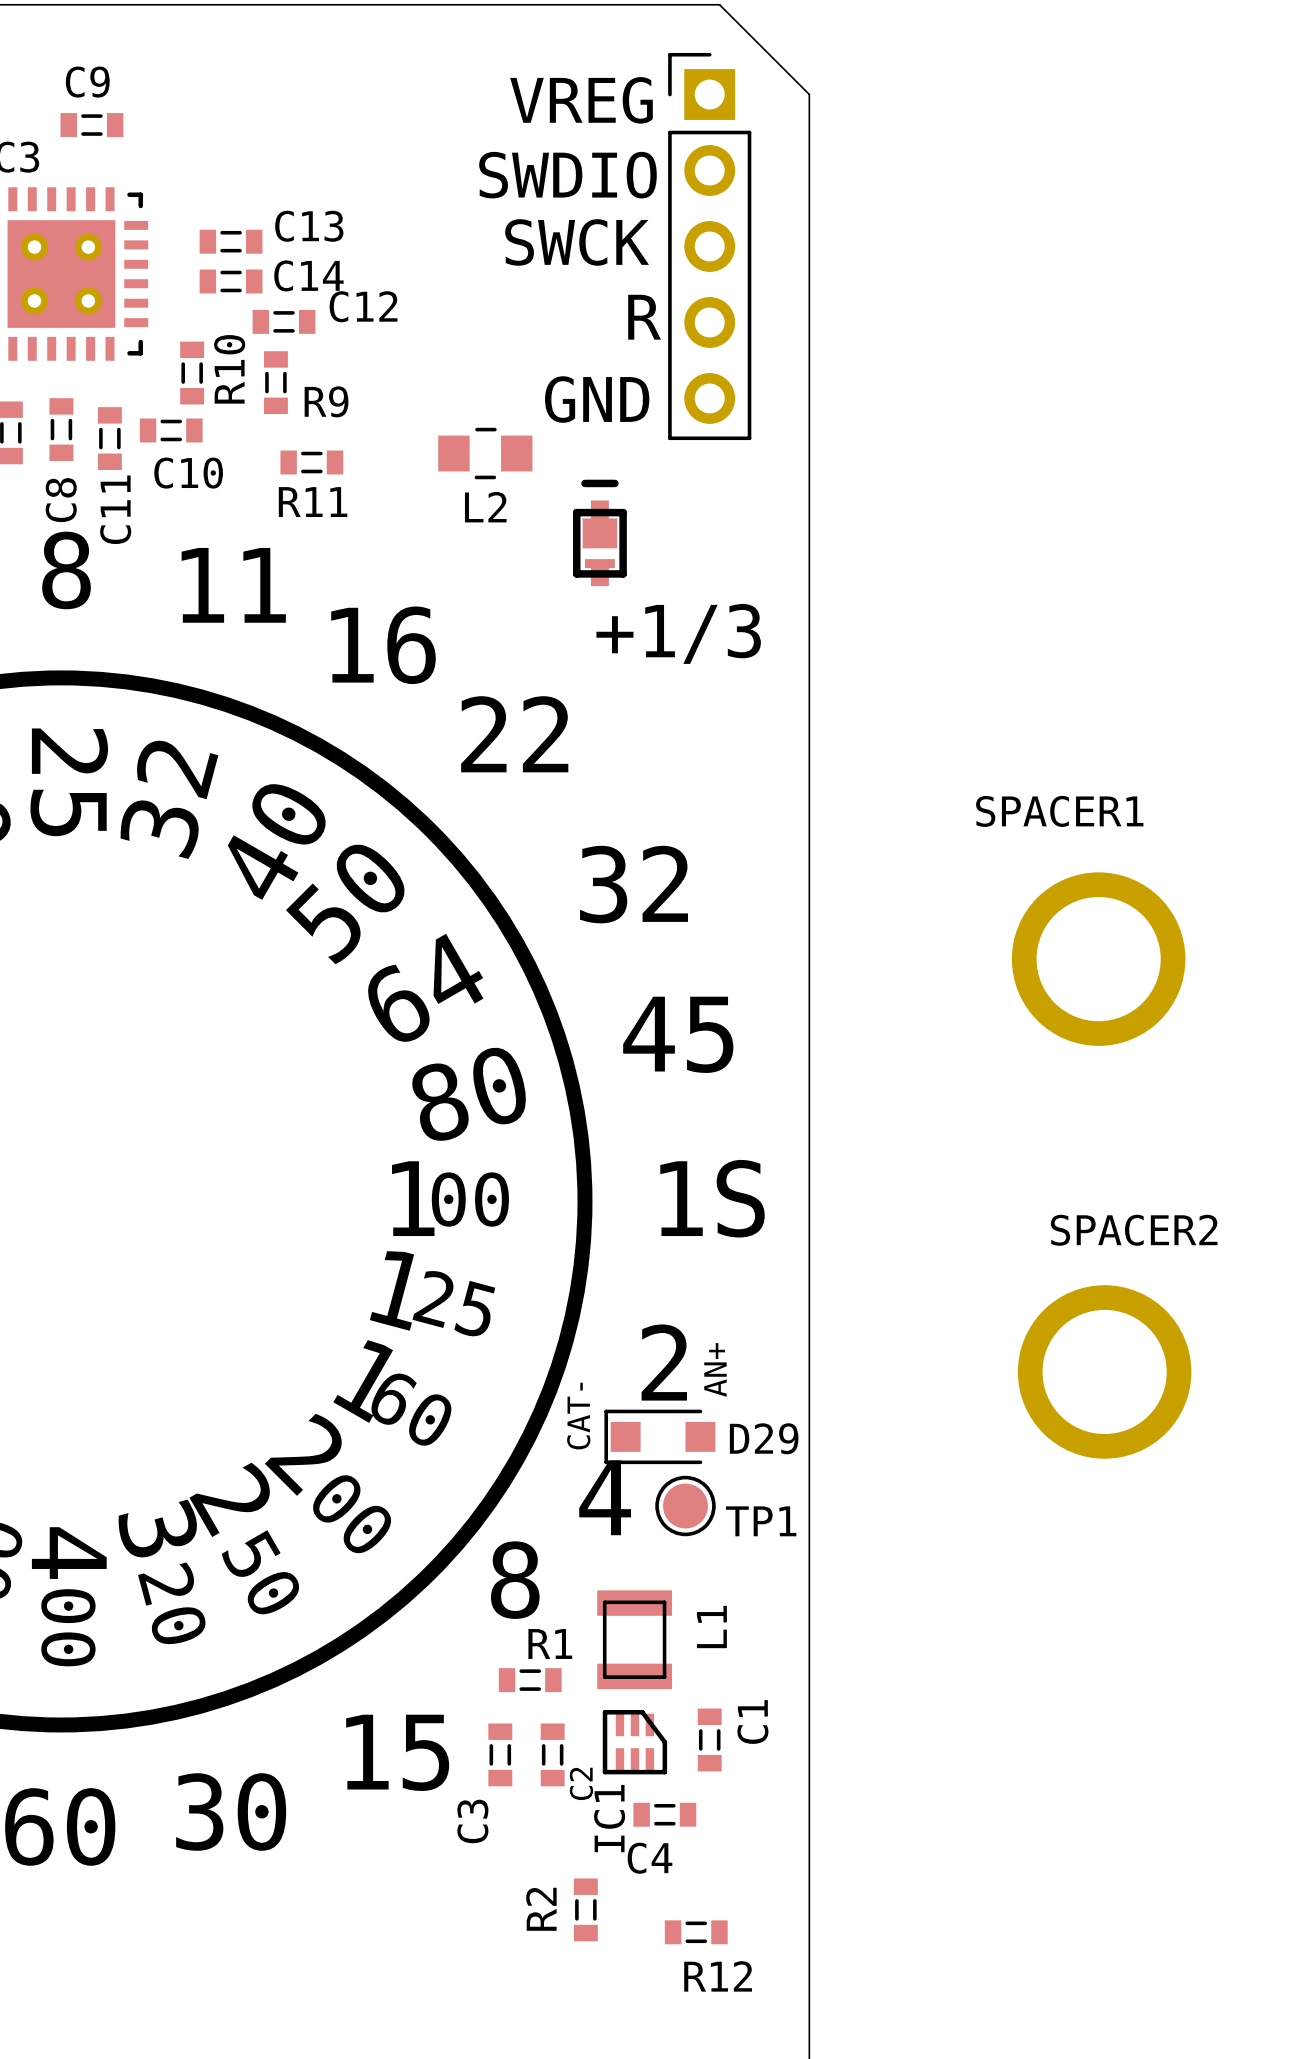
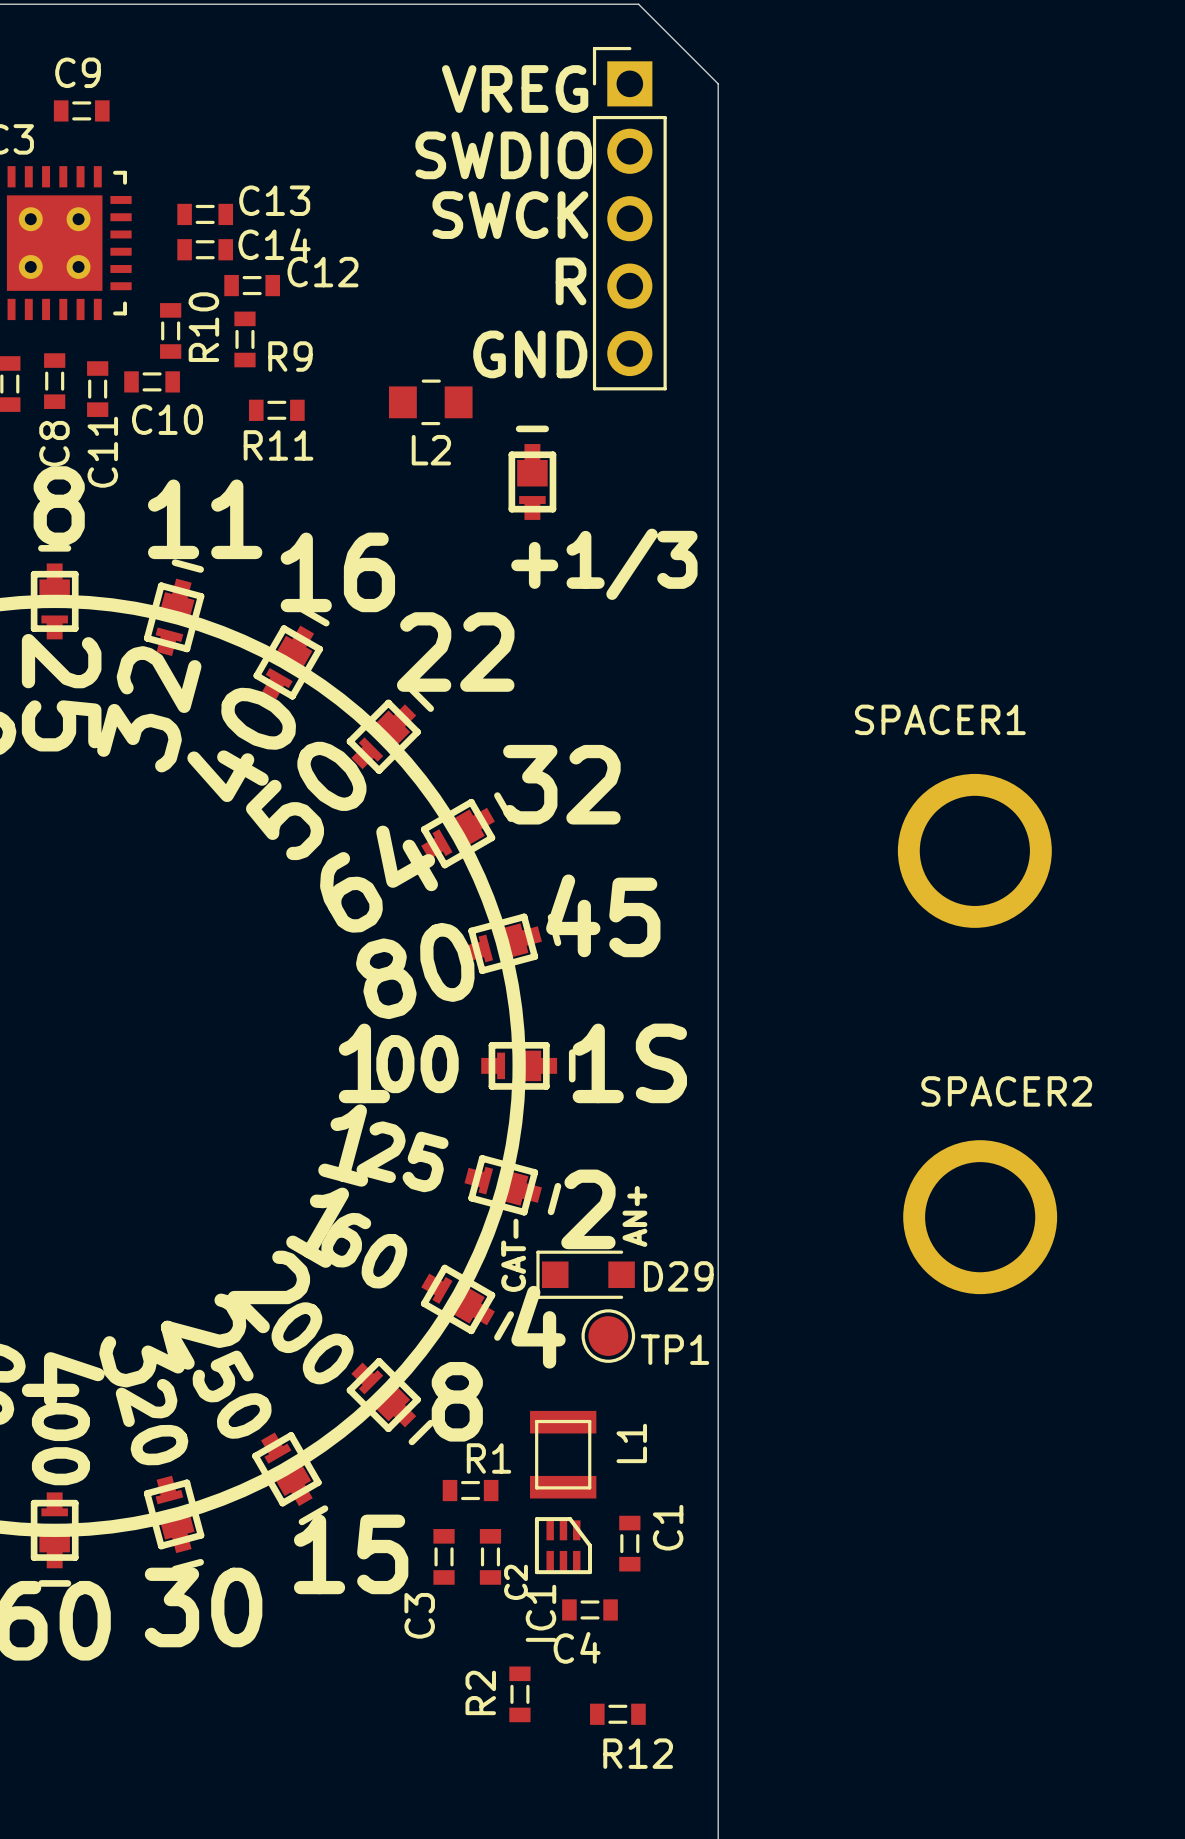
part: none -> (54, 592)
part: none -> (174, 607)
part: none -> (291, 653)
part: none -> (390, 730)
part: none -> (467, 830)
part: none -> (512, 943)
part: none -> (528, 1065)
part: none -> (512, 1185)
part: none -> (467, 1302)
part: none -> (390, 1401)
part: none -> (290, 1478)
part: none -> (174, 1524)
part: none -> (54, 1539)

